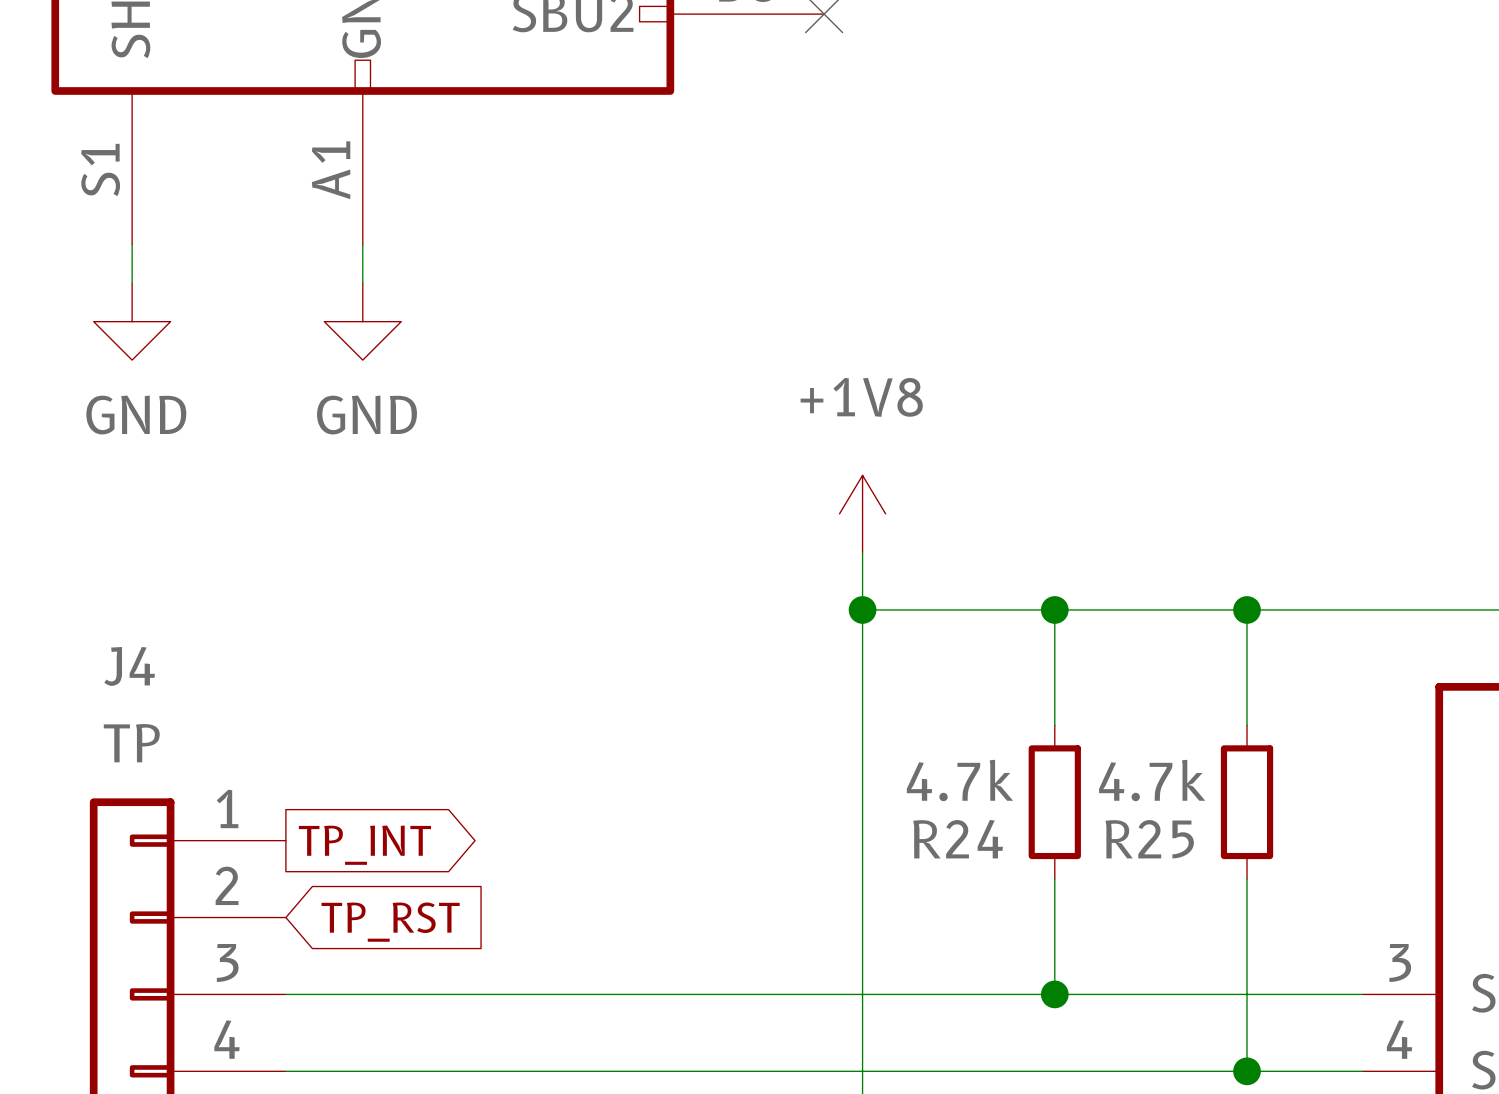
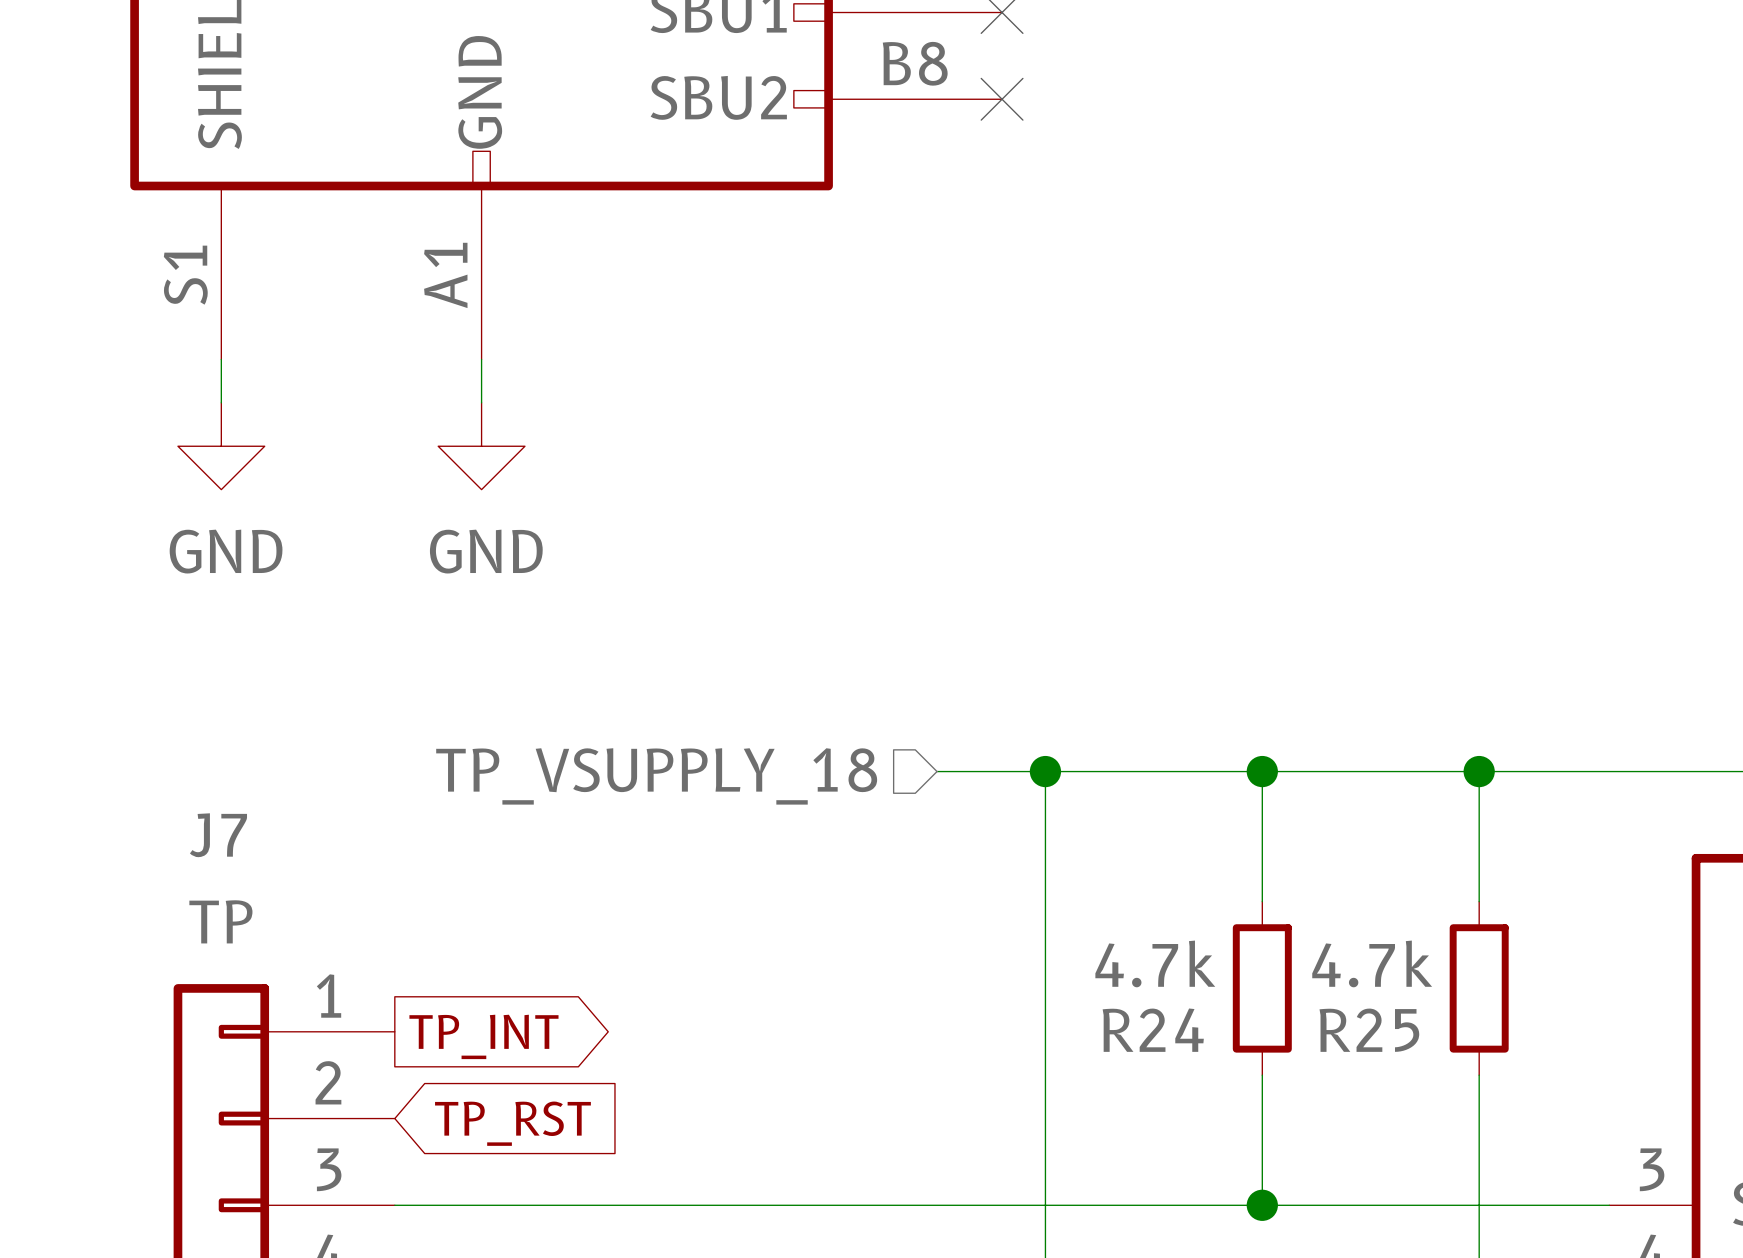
power symbol: +1V8 (862, 513) -> none
wire: (862, 552) (862, 609) -> (937, 771) (1045, 771)
hierarchical label: none -> TP_VSUPPLY_18 (656, 776)
J4 name: J4 (129, 666) -> J7 (218, 835)

